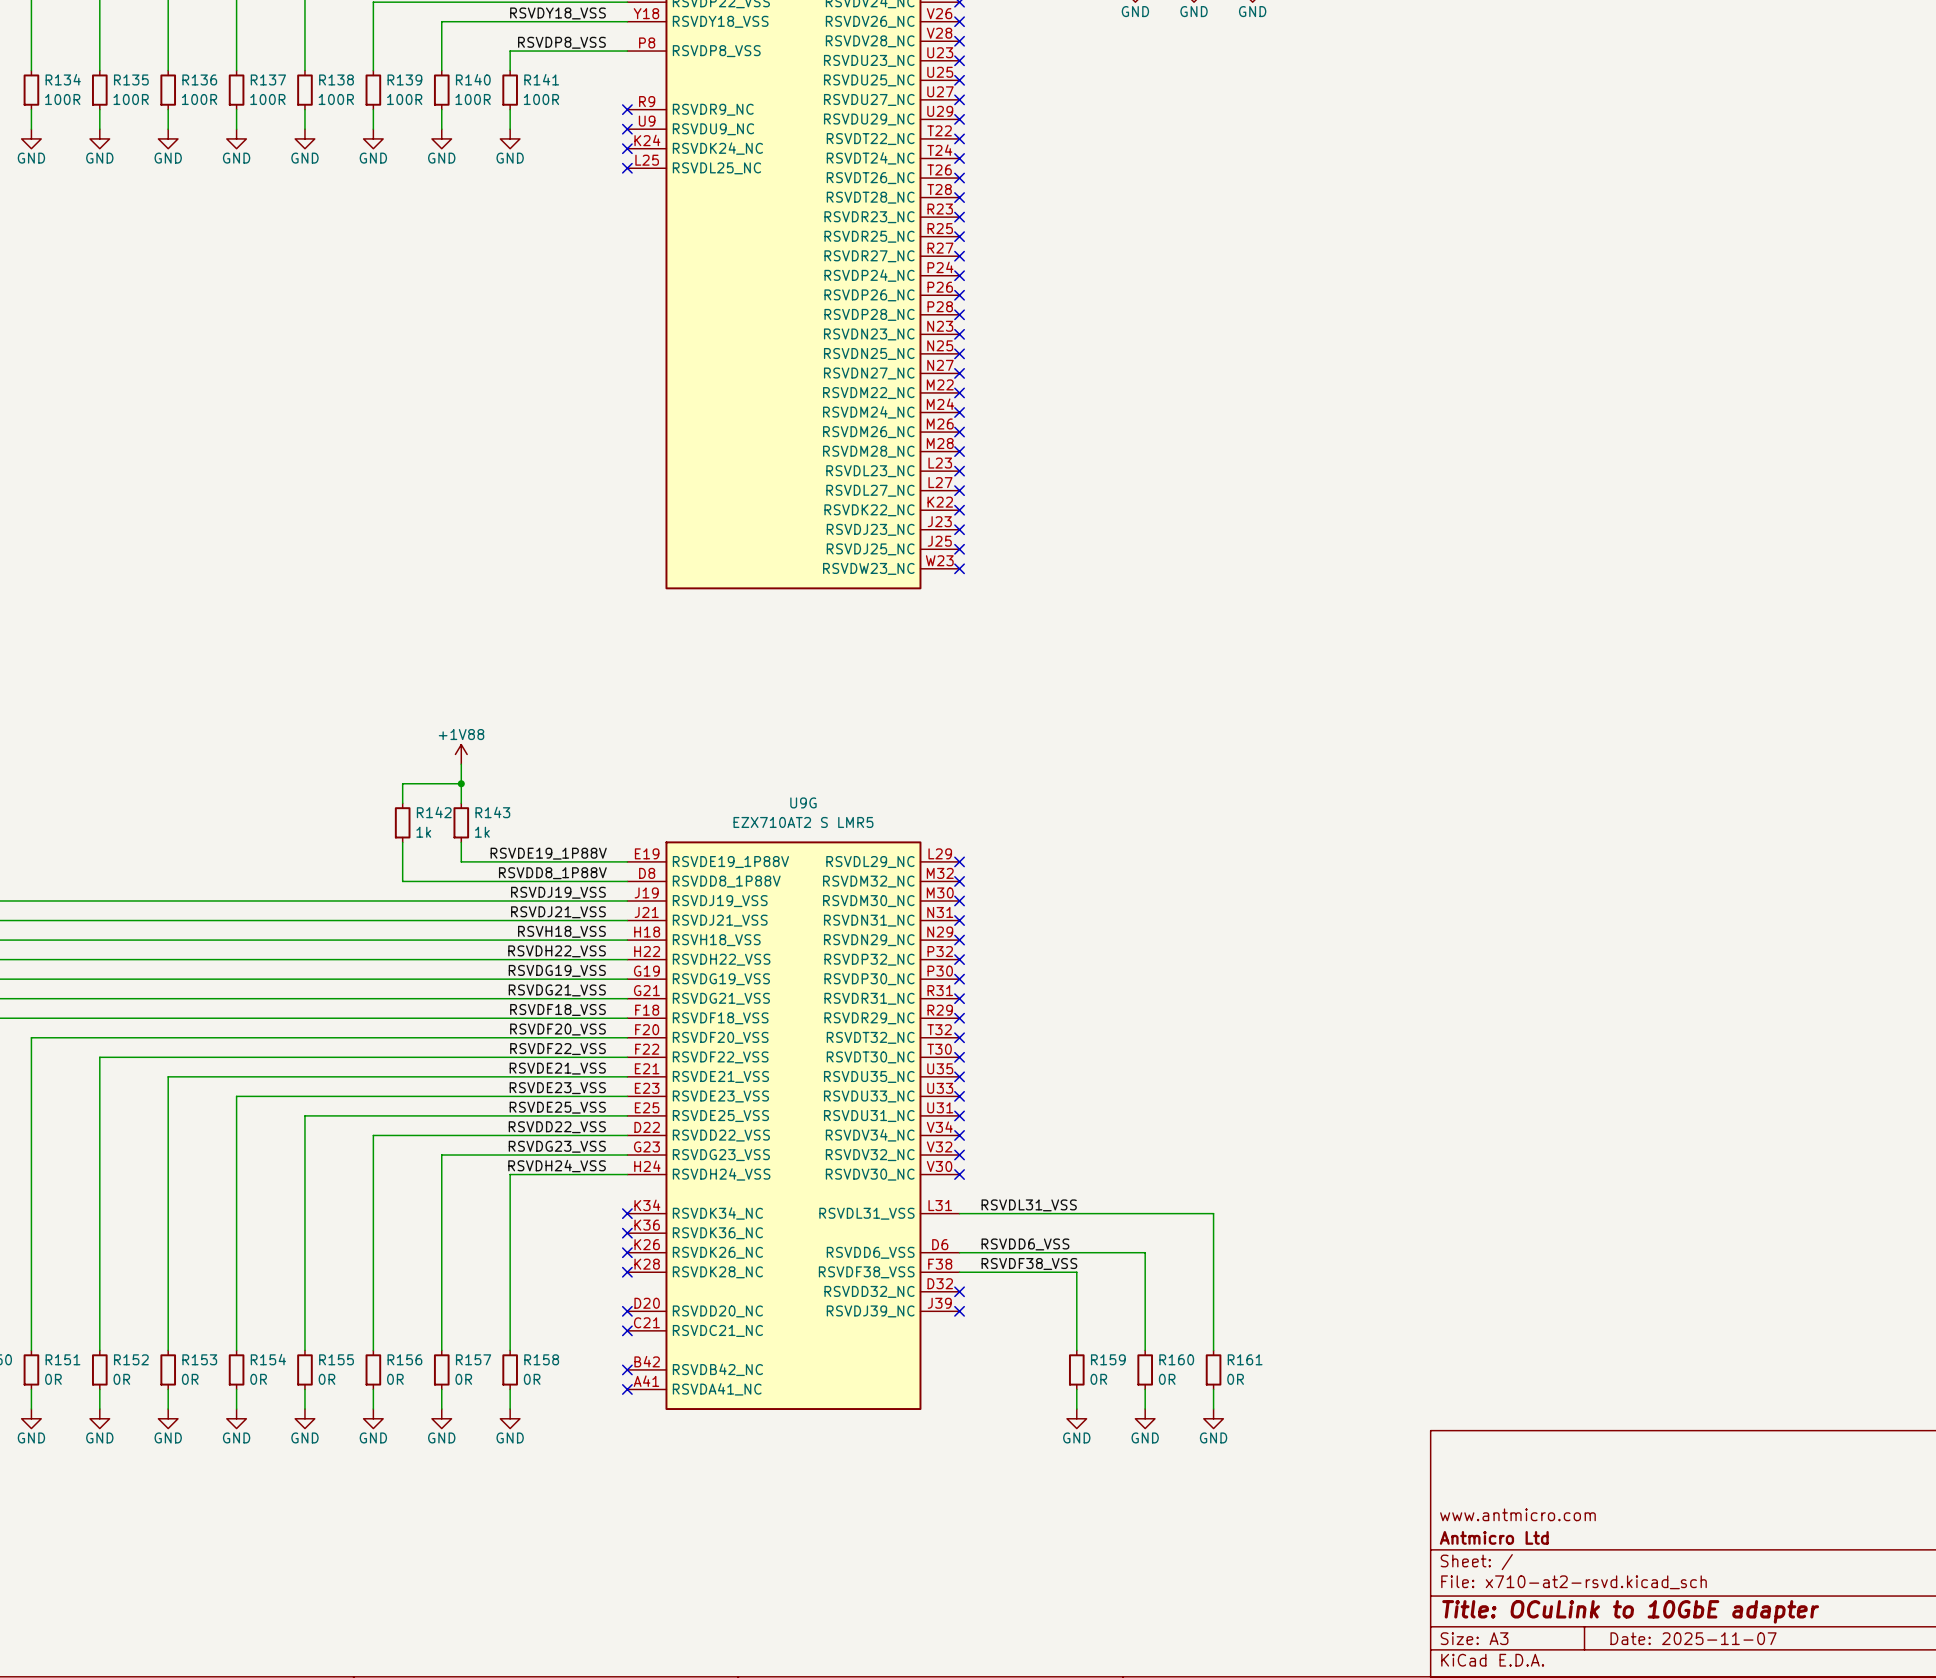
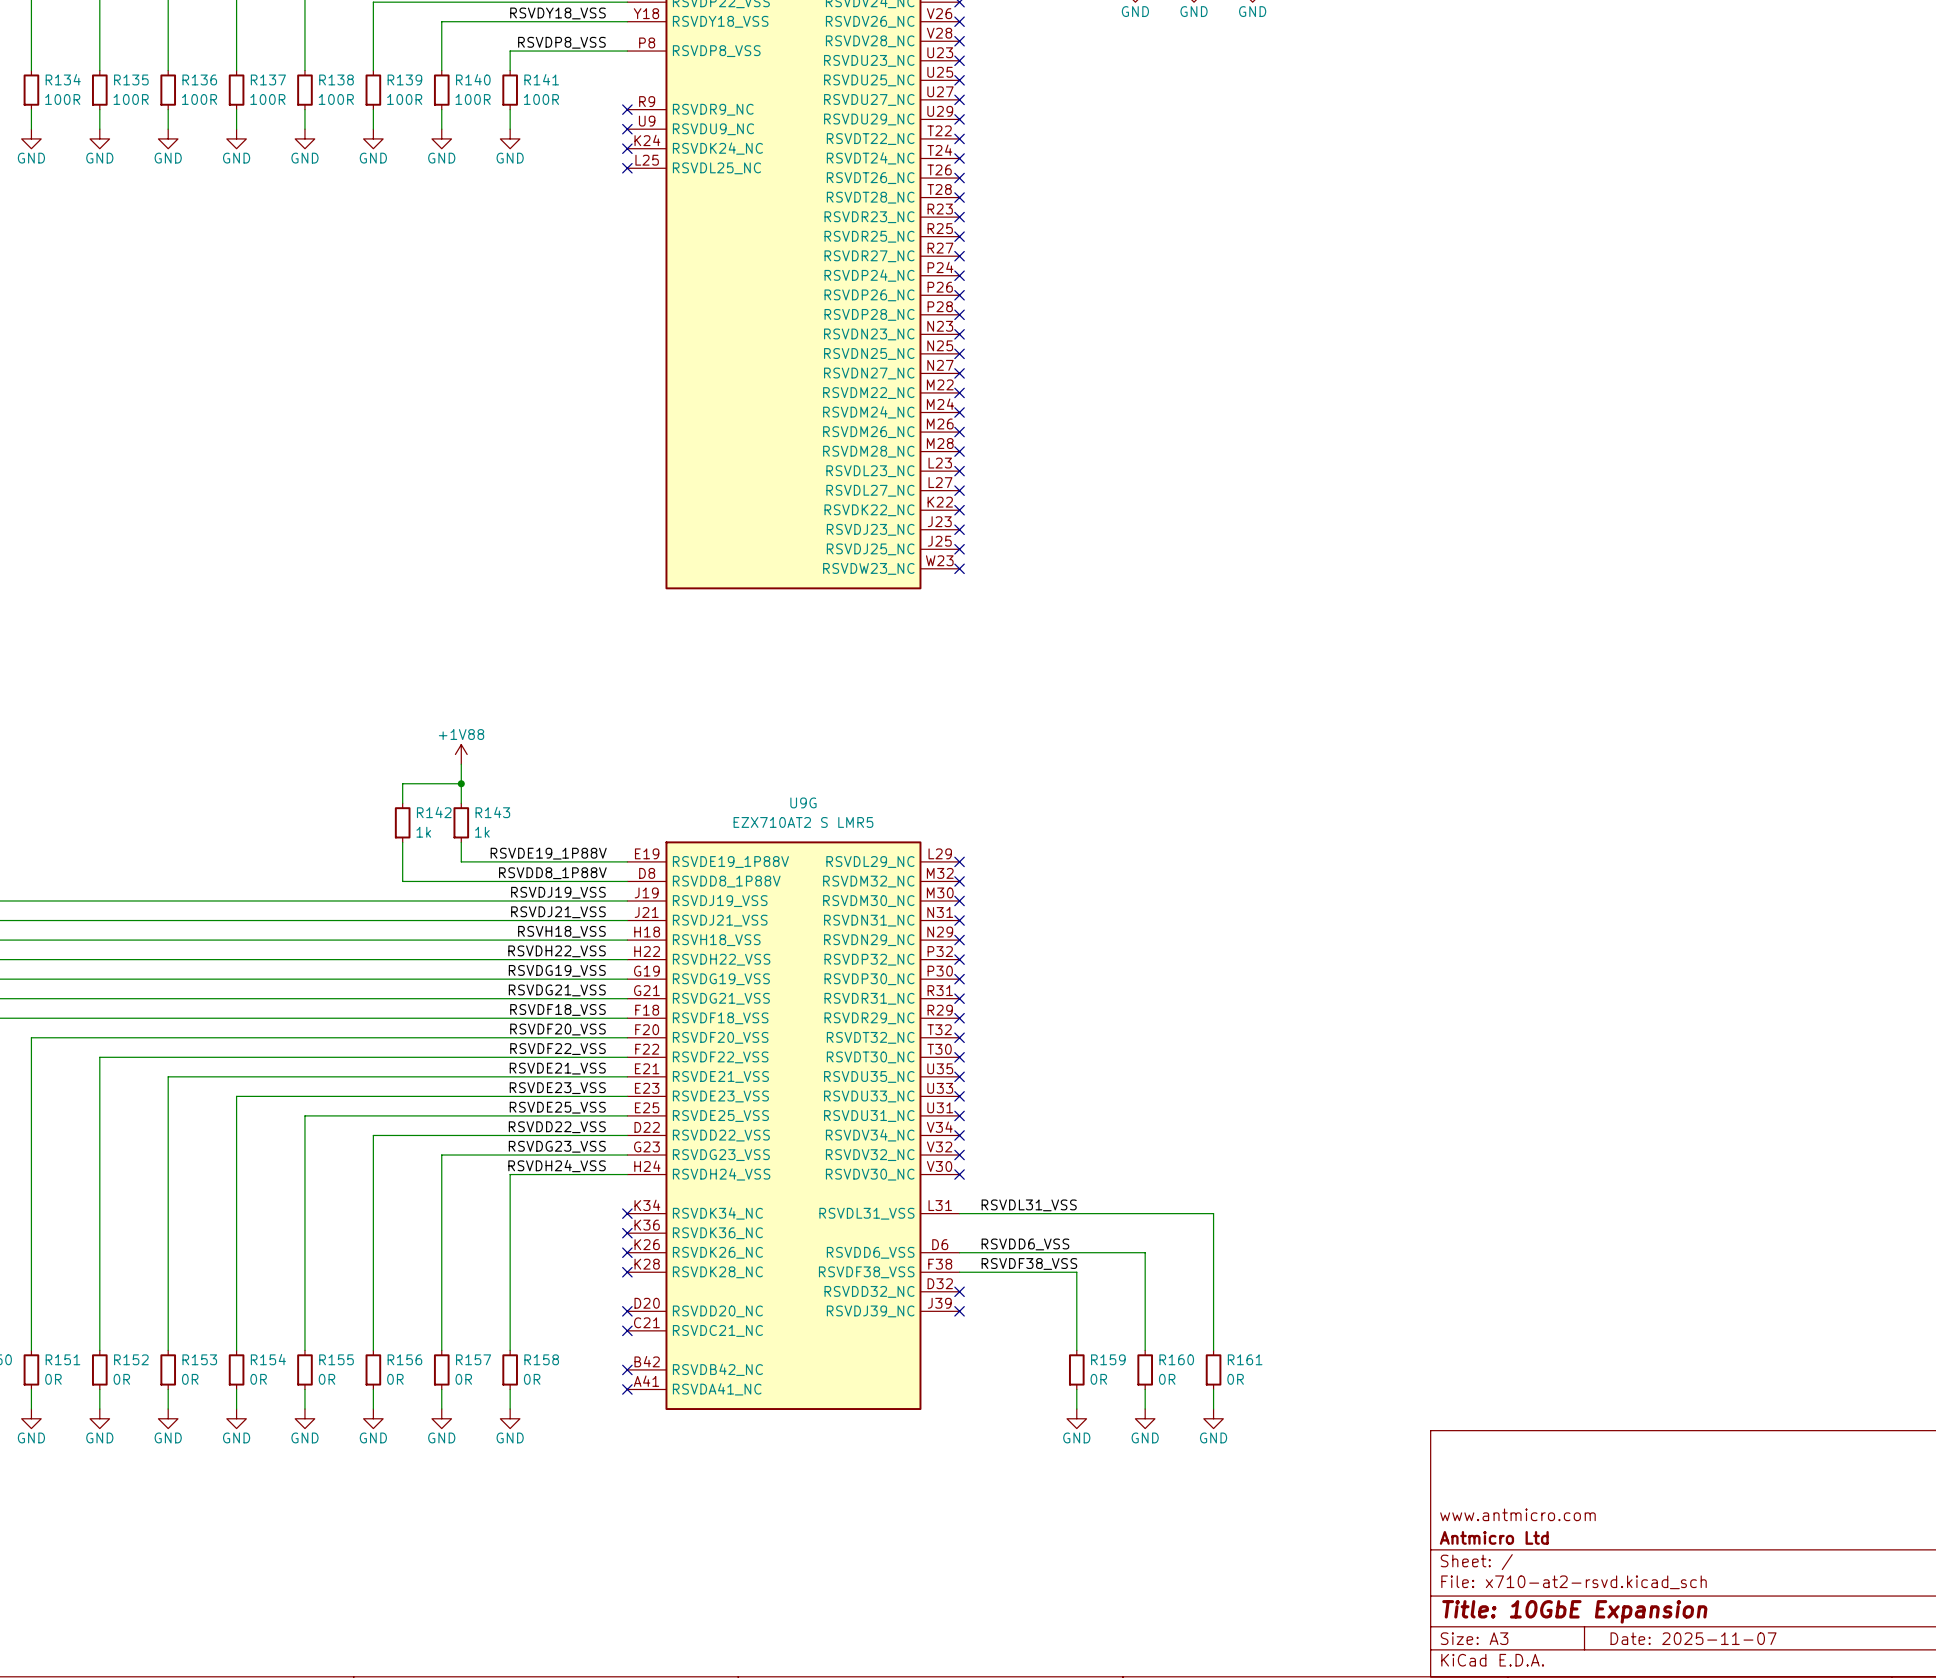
title block: Title: OCuLink to 10GbE adapter (1630, 1611) -> Title: 10GbE Expansion (1574, 1611)

